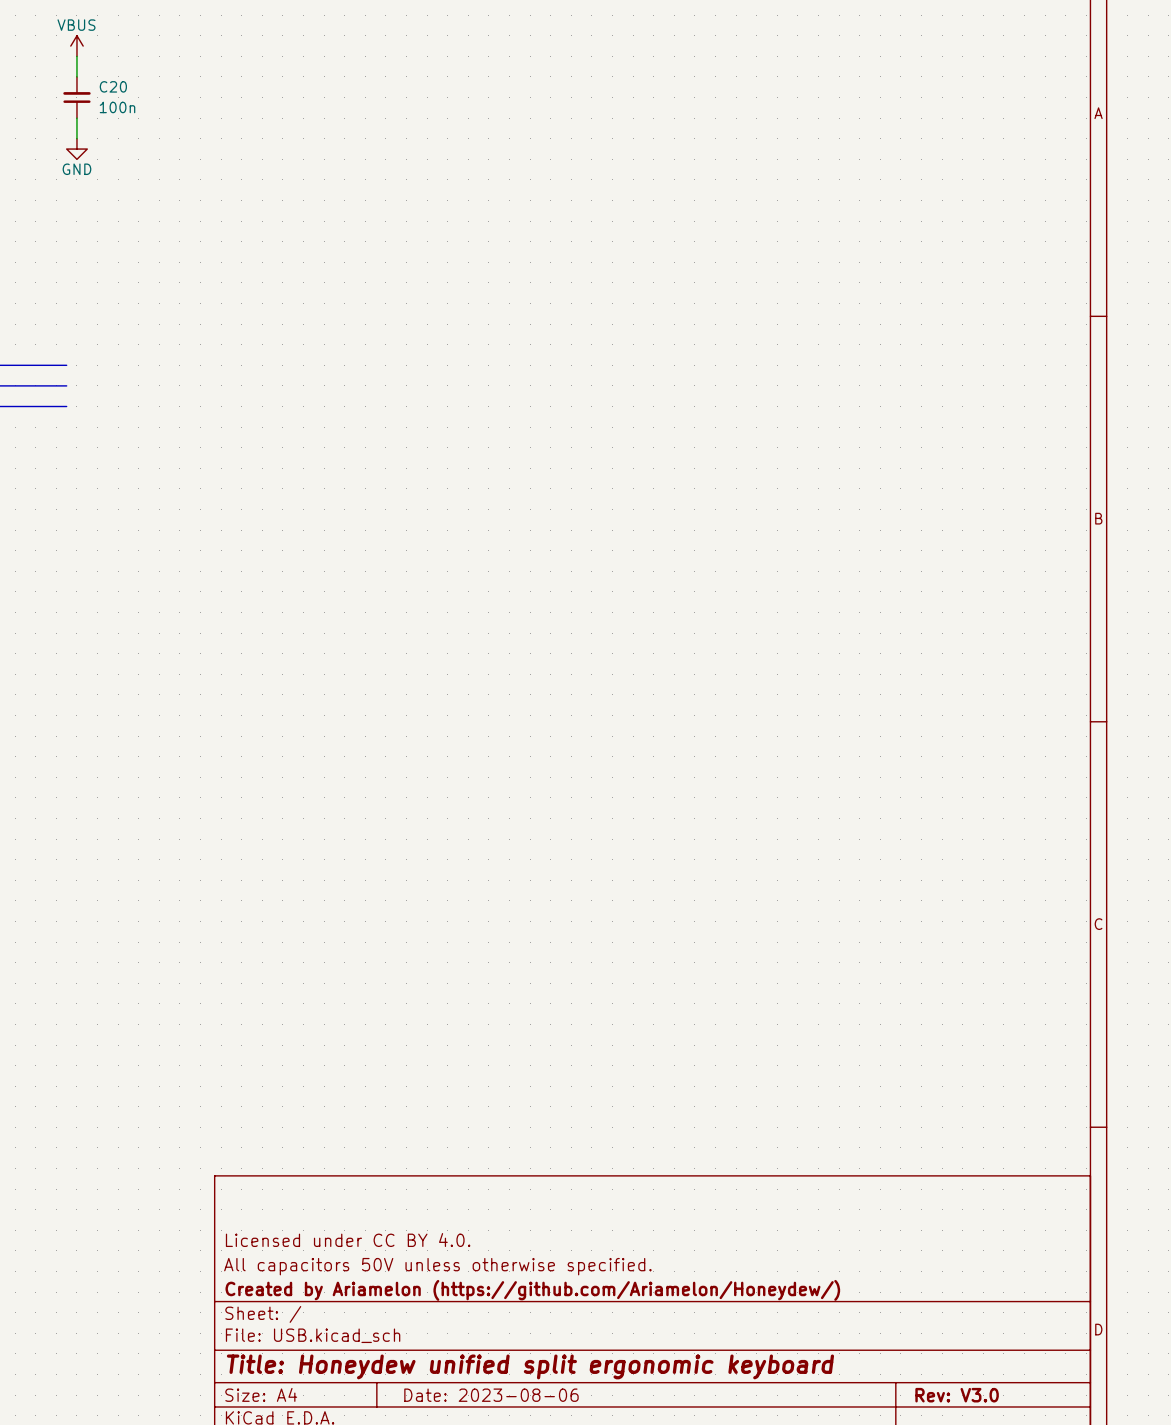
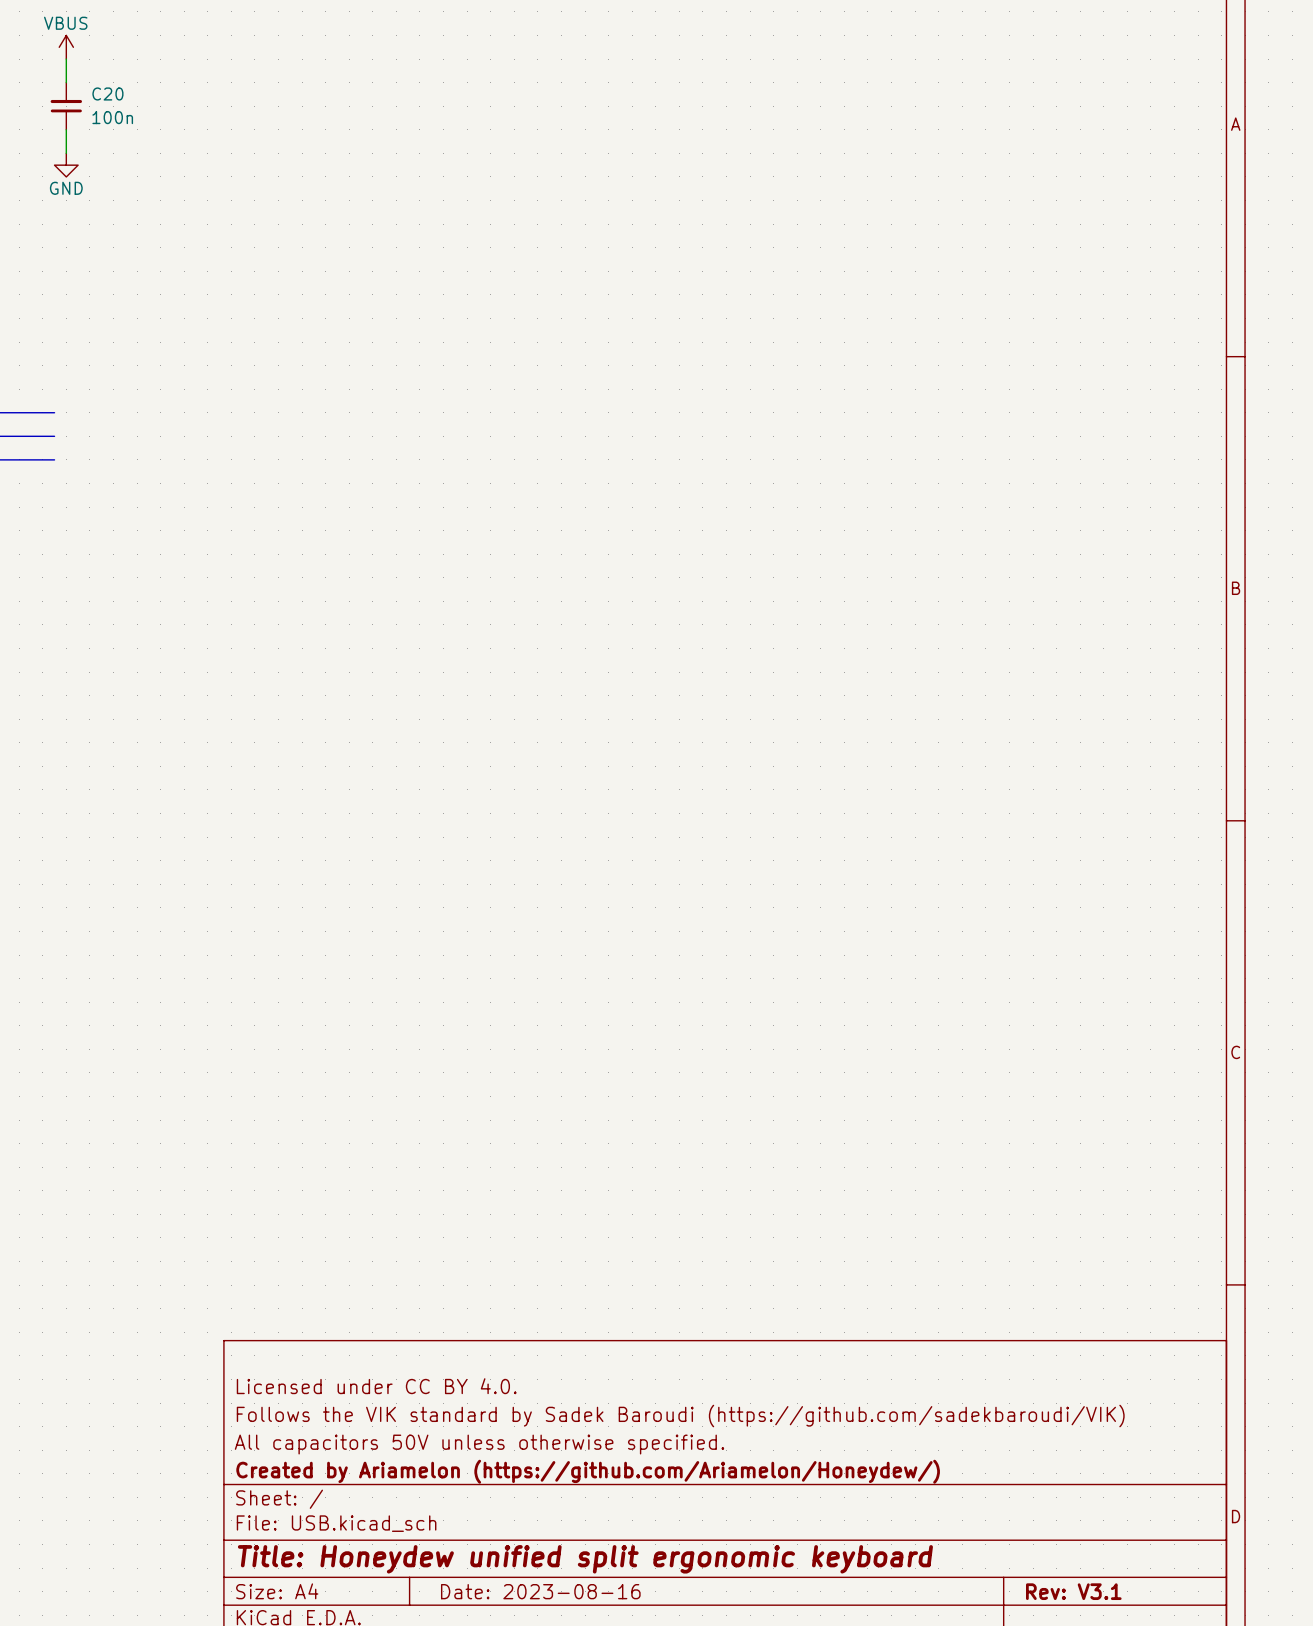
title block: none -> Licensed under CC BY 4.0. (376, 1386)
title block: Licensed under CC BY 4.0. (348, 1240) -> Follows the VIK standard by Sadek Baroudi (https://github.com/sadekbaroudi/VIK) (680, 1416)
title block: Date: 2023-08-06 (491, 1395) -> Date: 2023-08-16 (540, 1591)
title block: Rev: V3.0 (957, 1395) -> Rev: V3.1 (1073, 1591)

